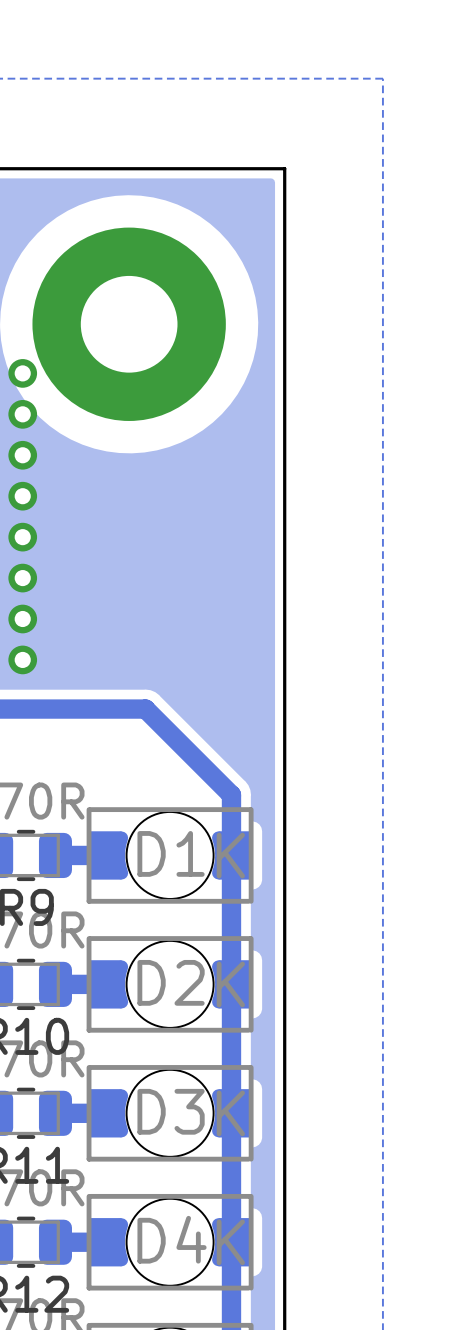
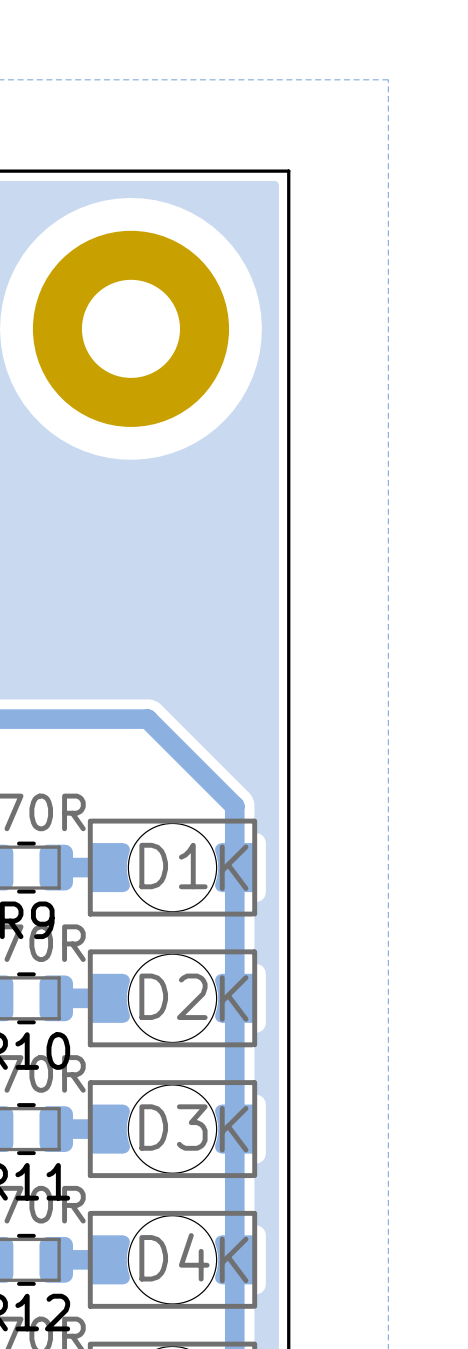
via: (22, 373) -> none
via: (22, 414) -> none
via: (22, 455) -> none
via: (22, 496) -> none
via: (22, 537) -> none
via: (22, 578) -> none
via: (22, 619) -> none
via: (22, 659) -> none

